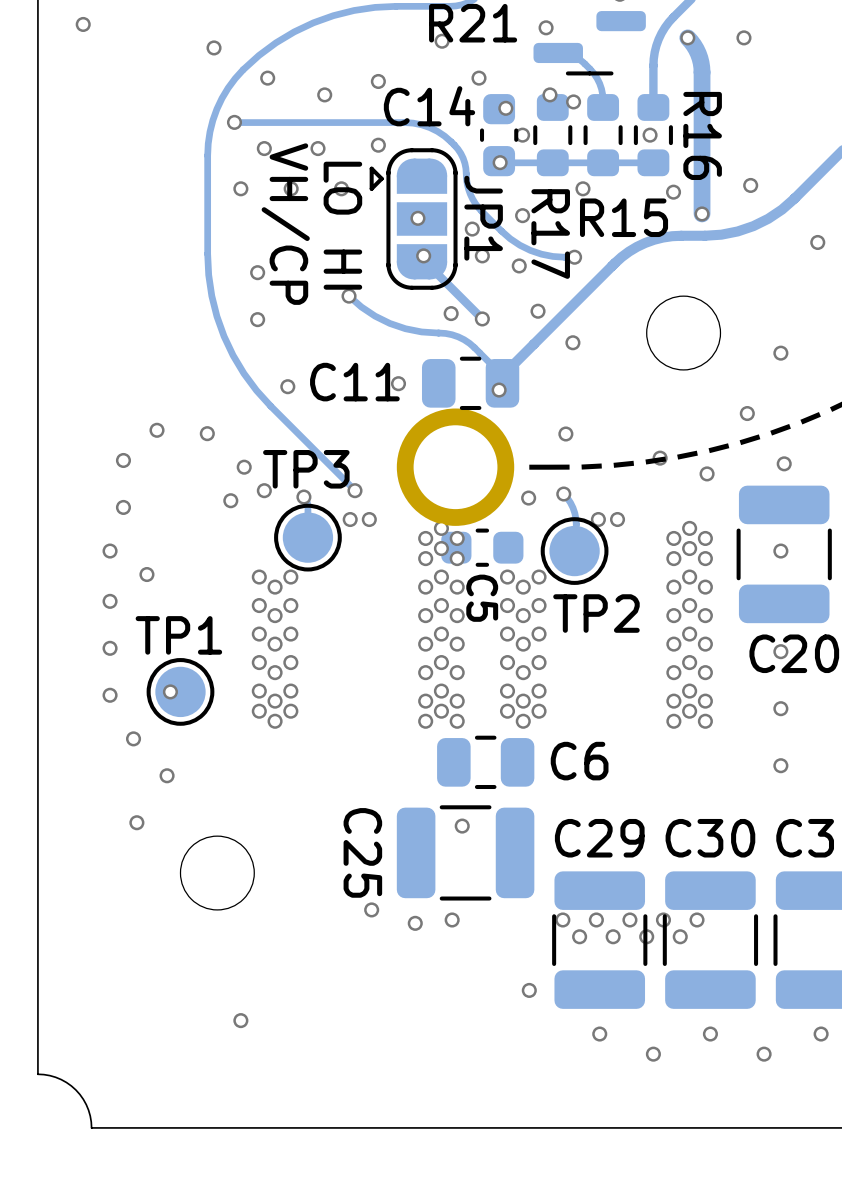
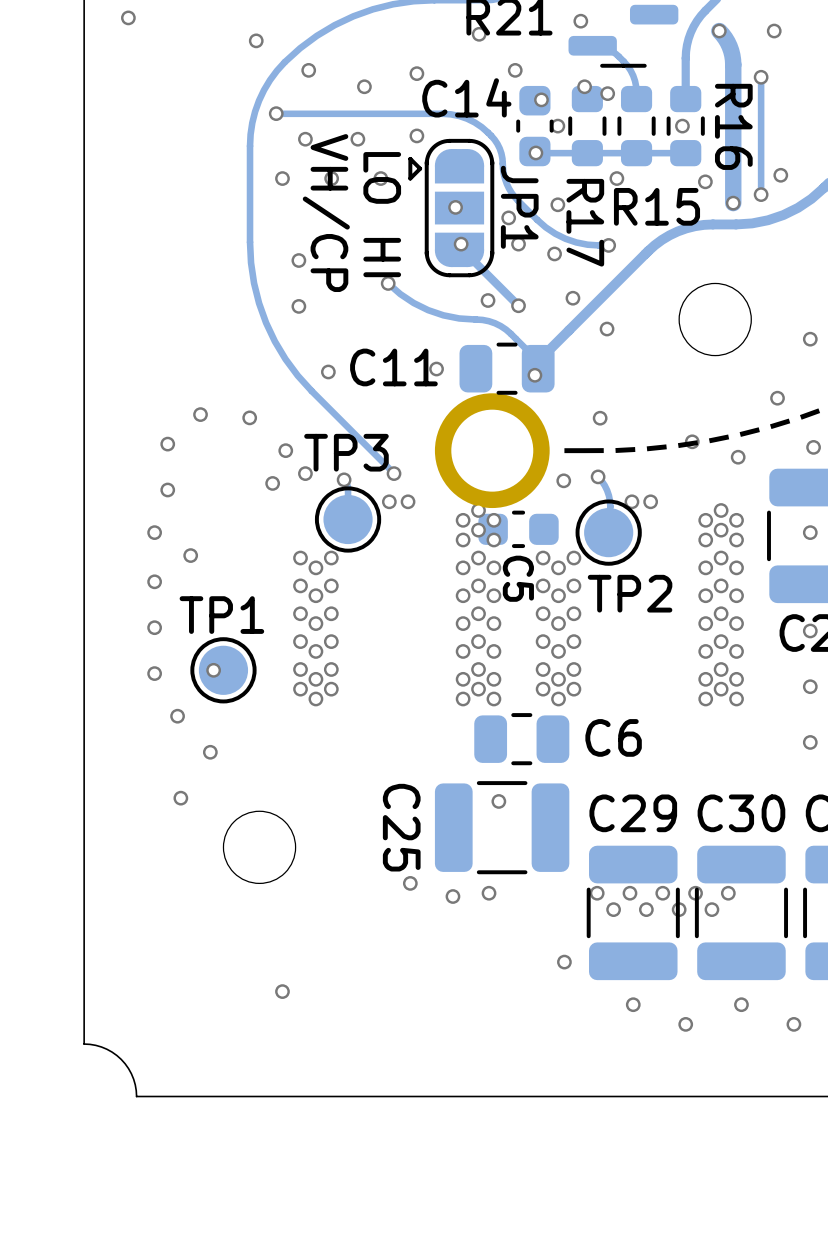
track: none -> (761, 77) (761, 194)
via: none -> (761, 77)
via: none -> (761, 194)

